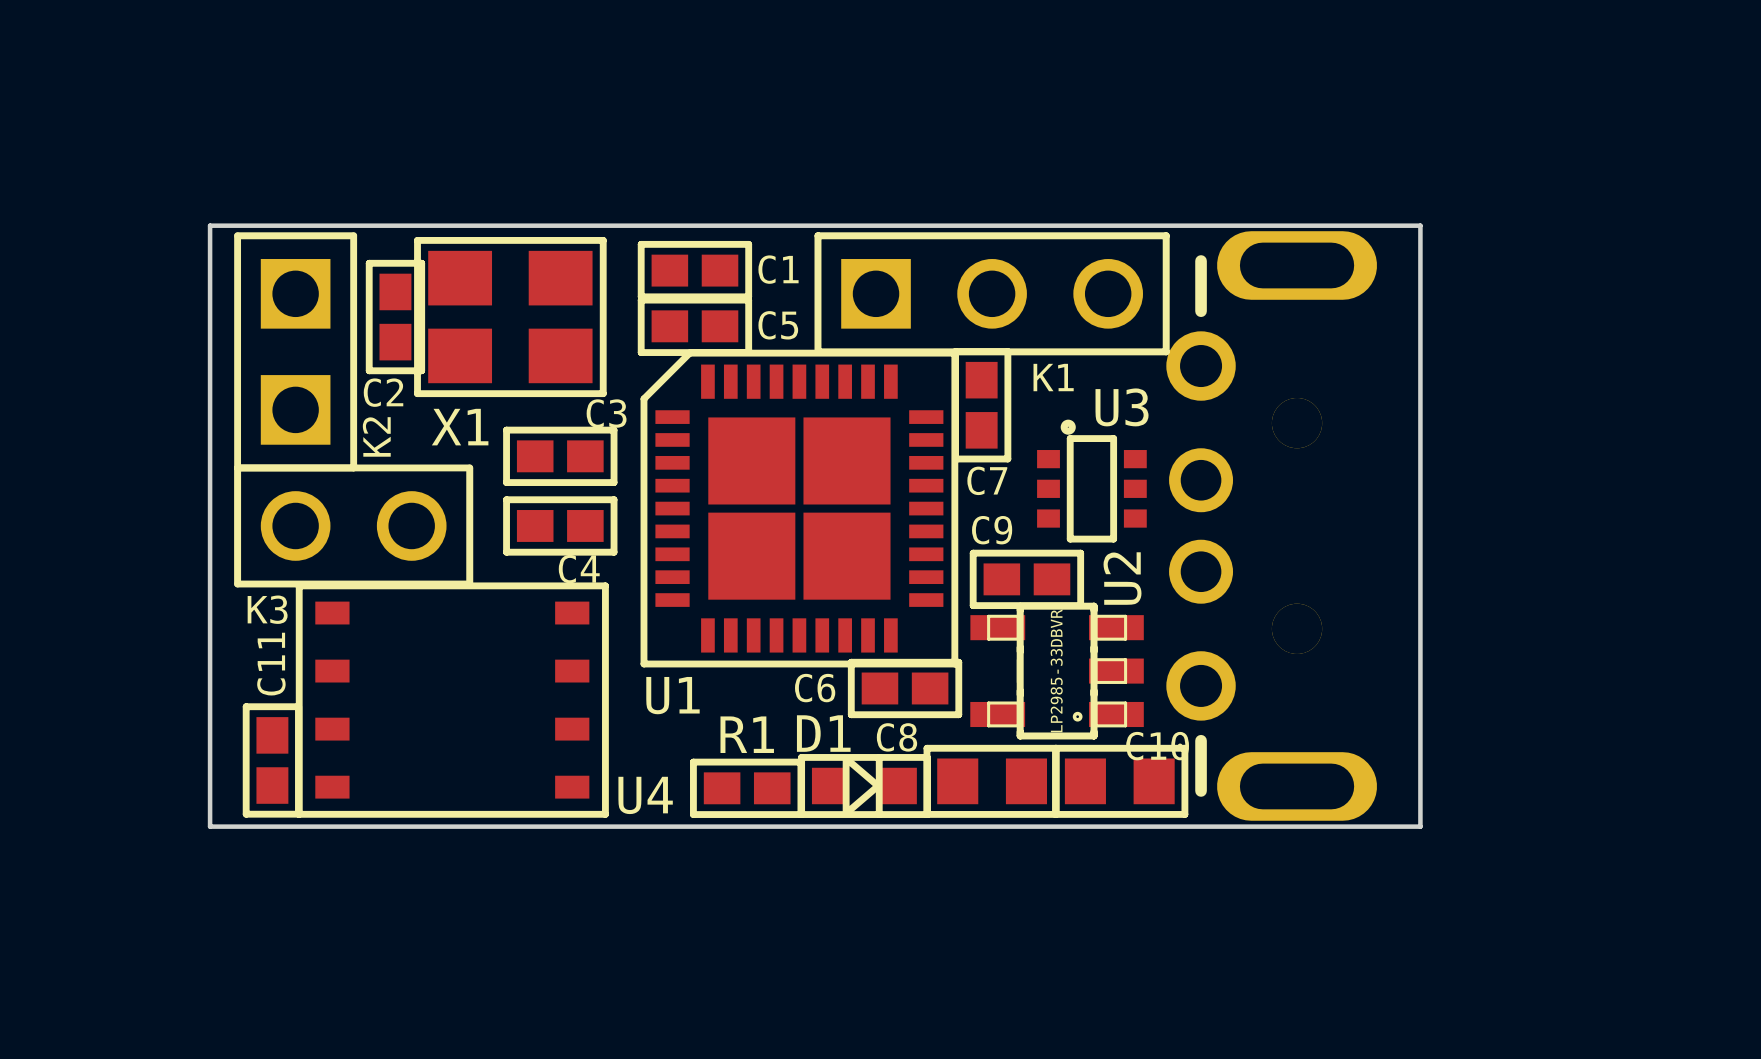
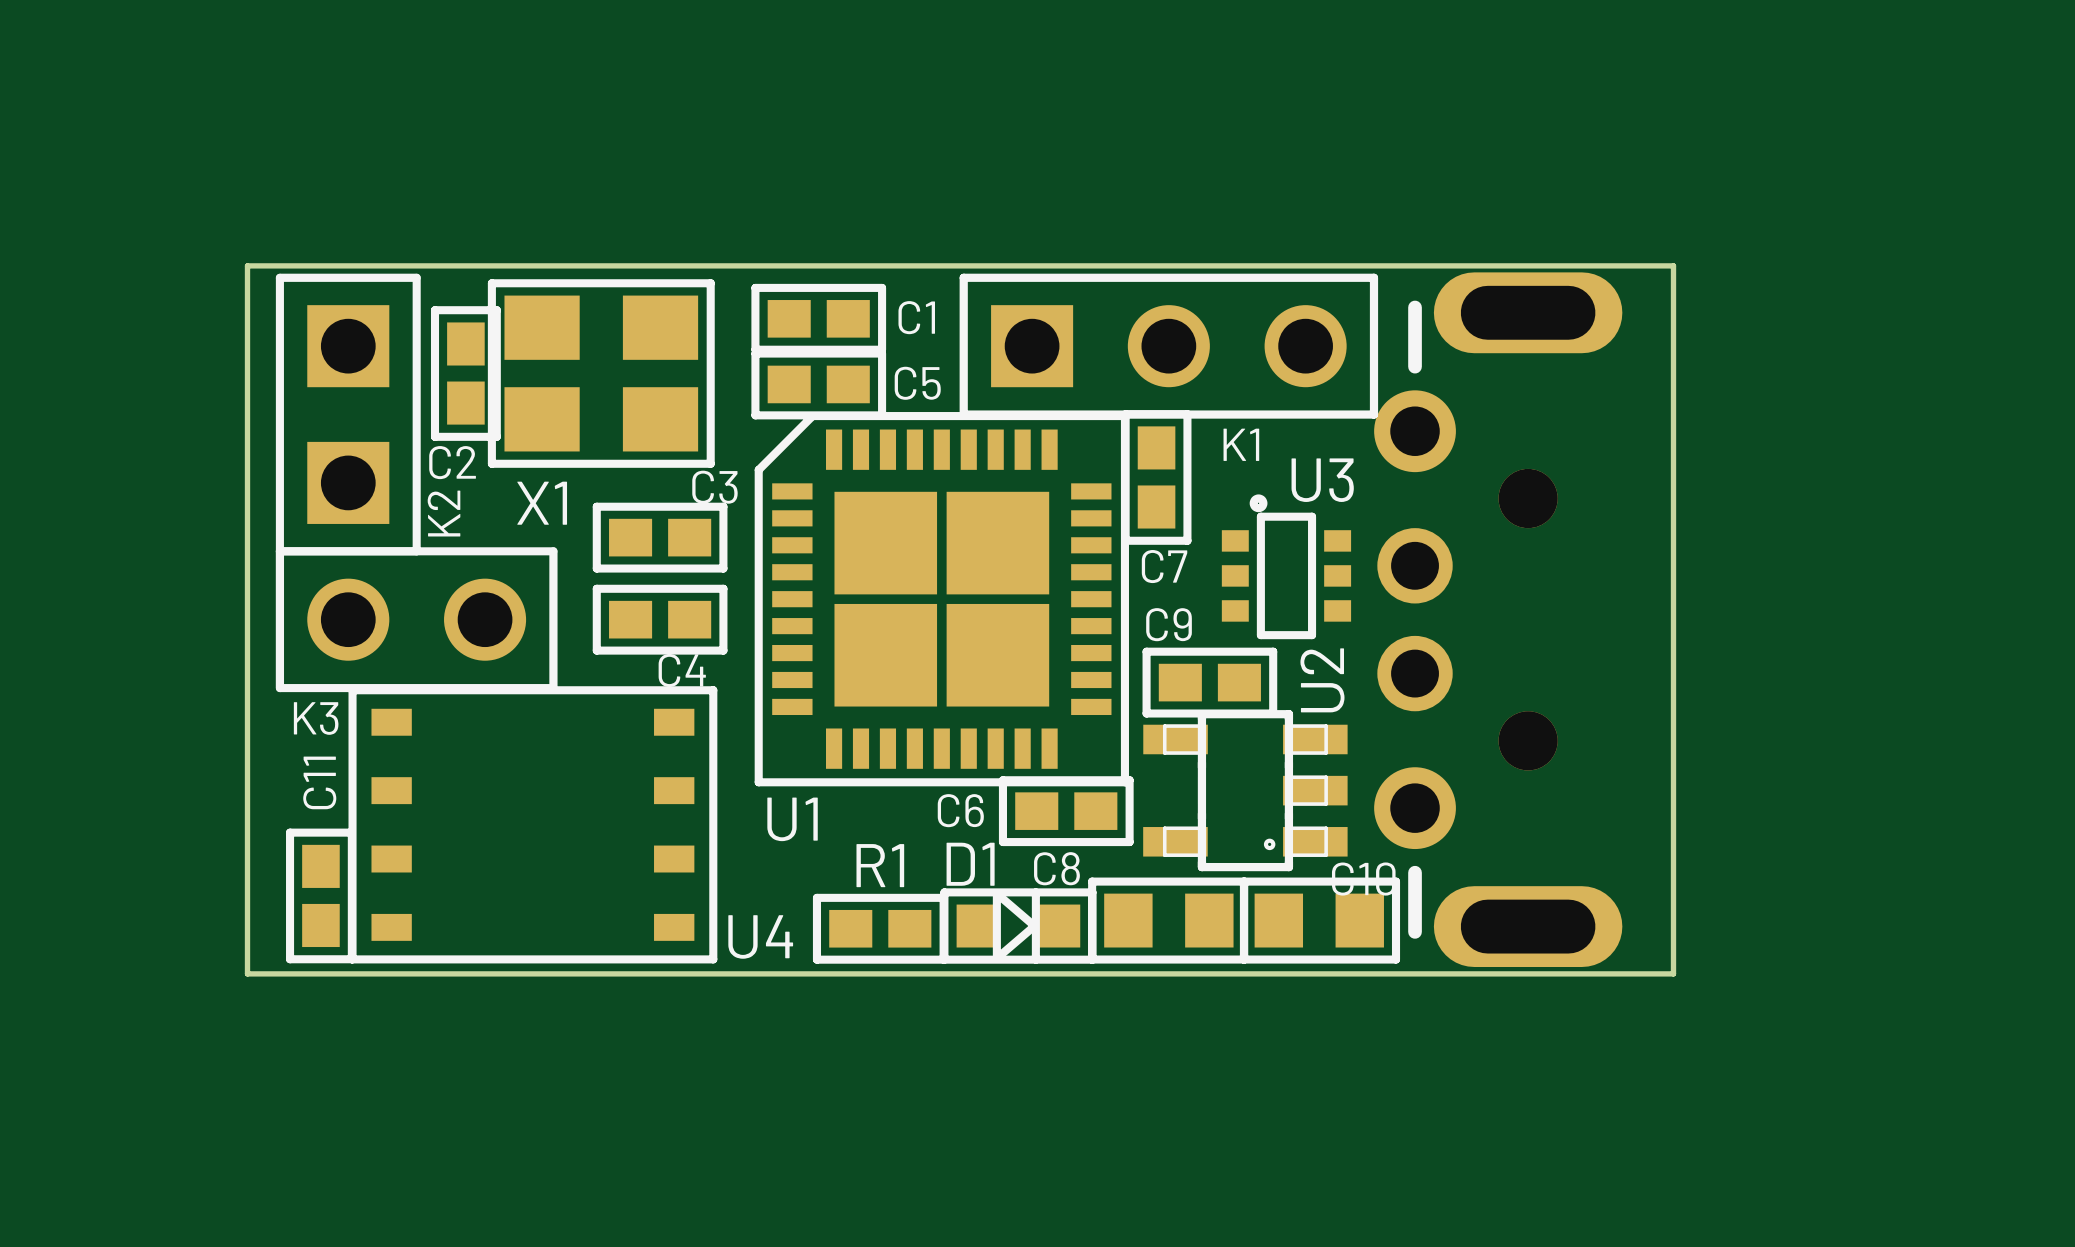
U2 value: LP2985-33DBVR (1056, 670) -> none

